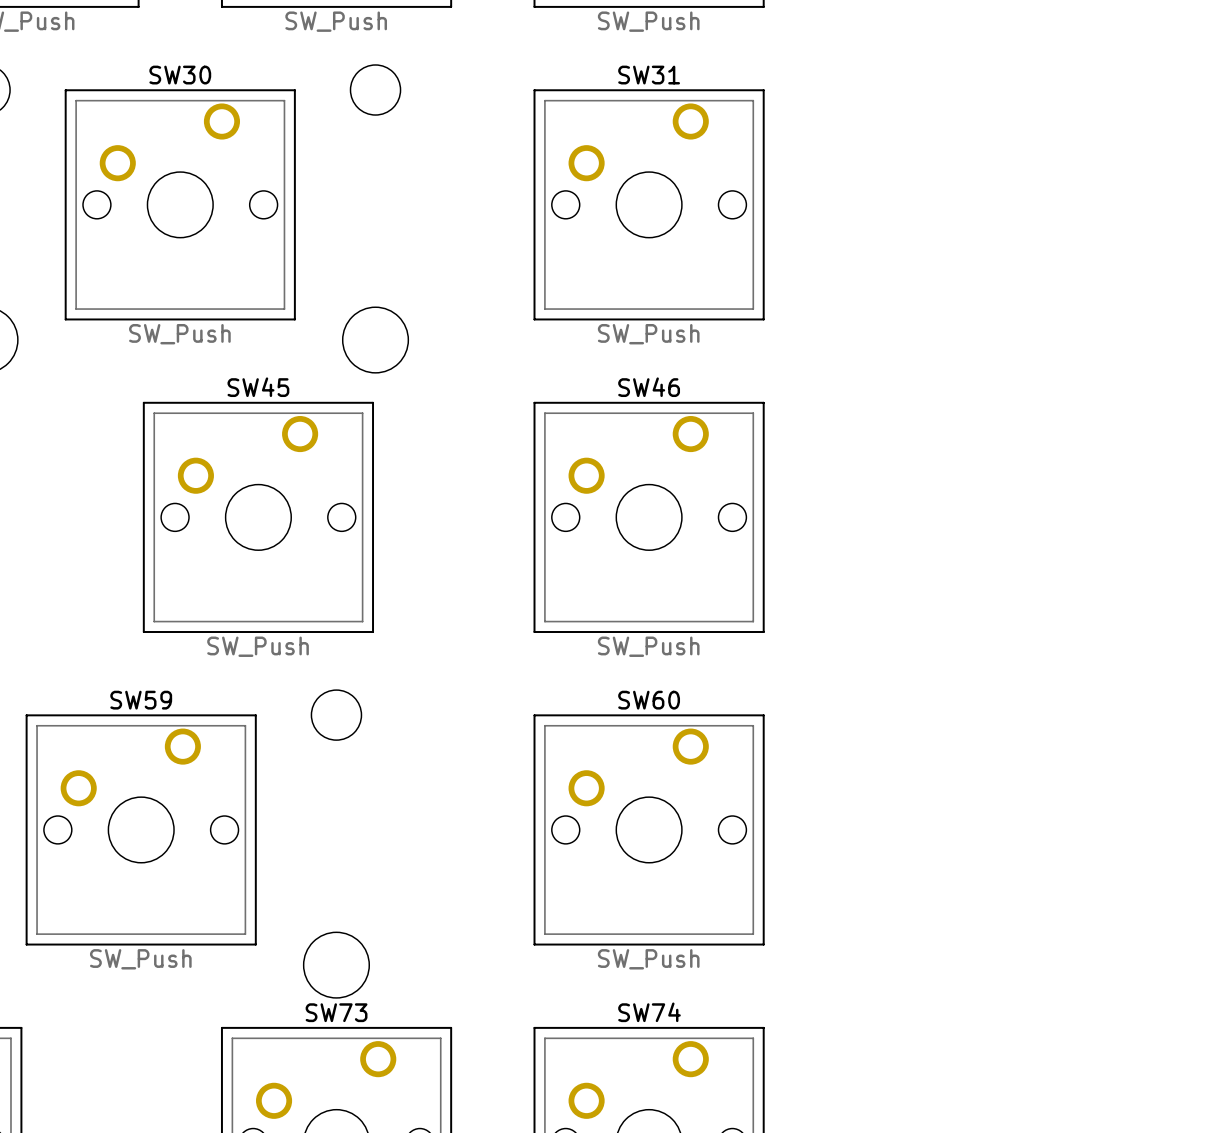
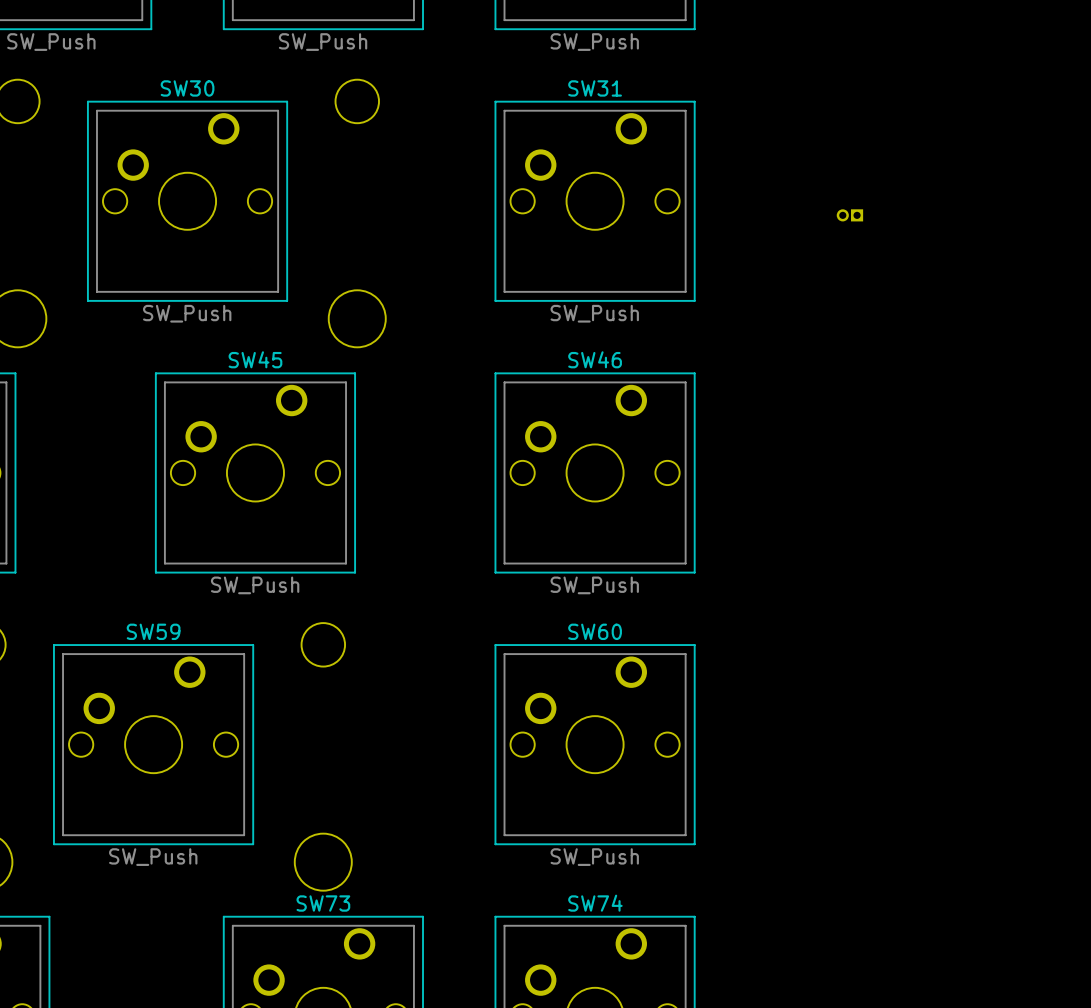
part: none -> (849, 215)

